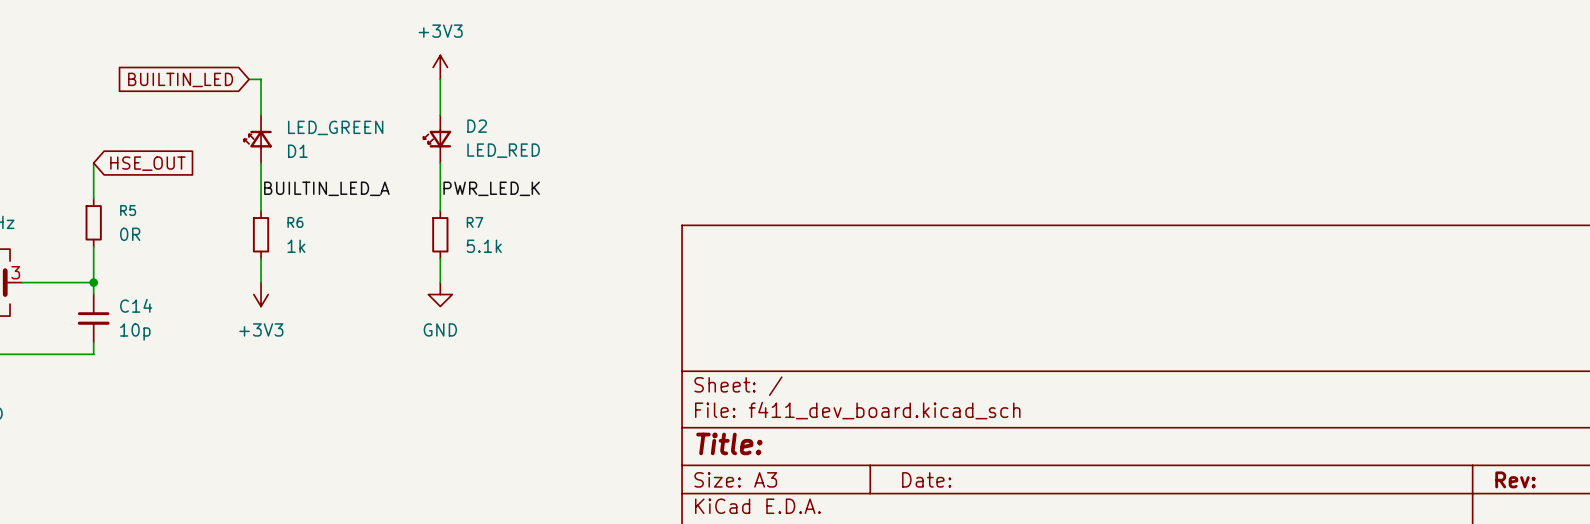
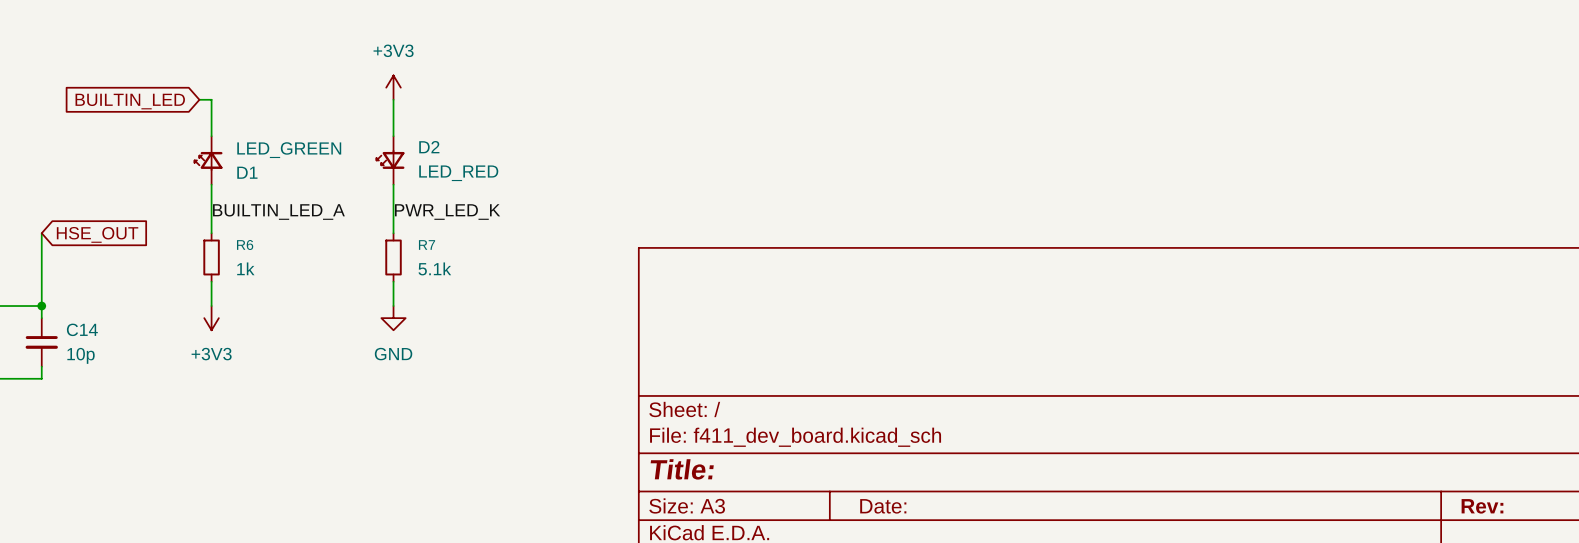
wire: (93, 163) (93, 198) -> (41, 233) (41, 269)
global label position: HSE_OUT (147, 163) -> HSE_OUT (97, 234)
R5: 0R (93, 222) -> none

